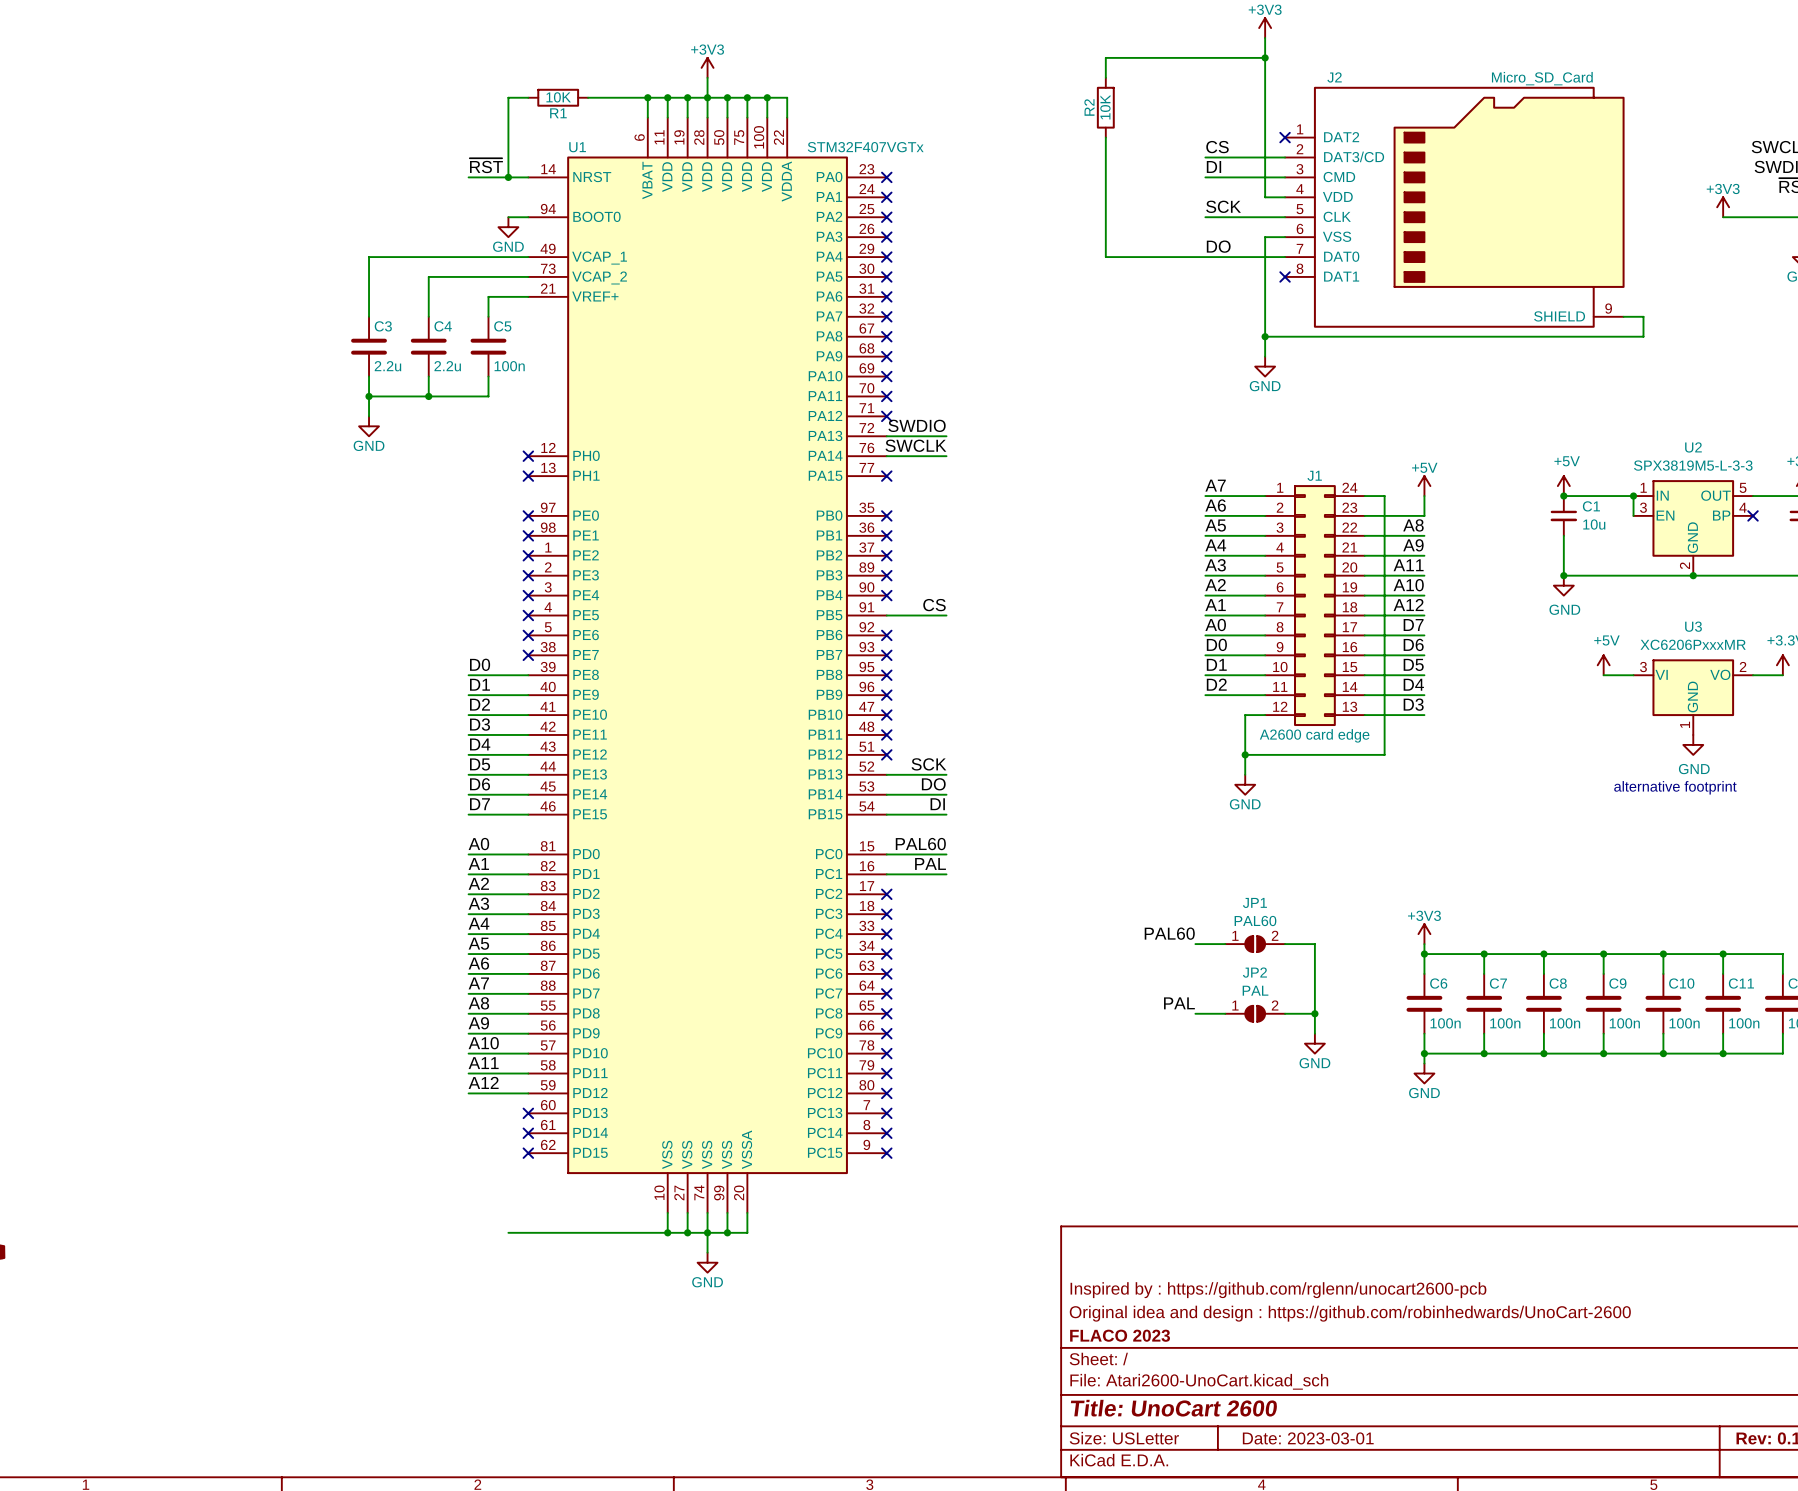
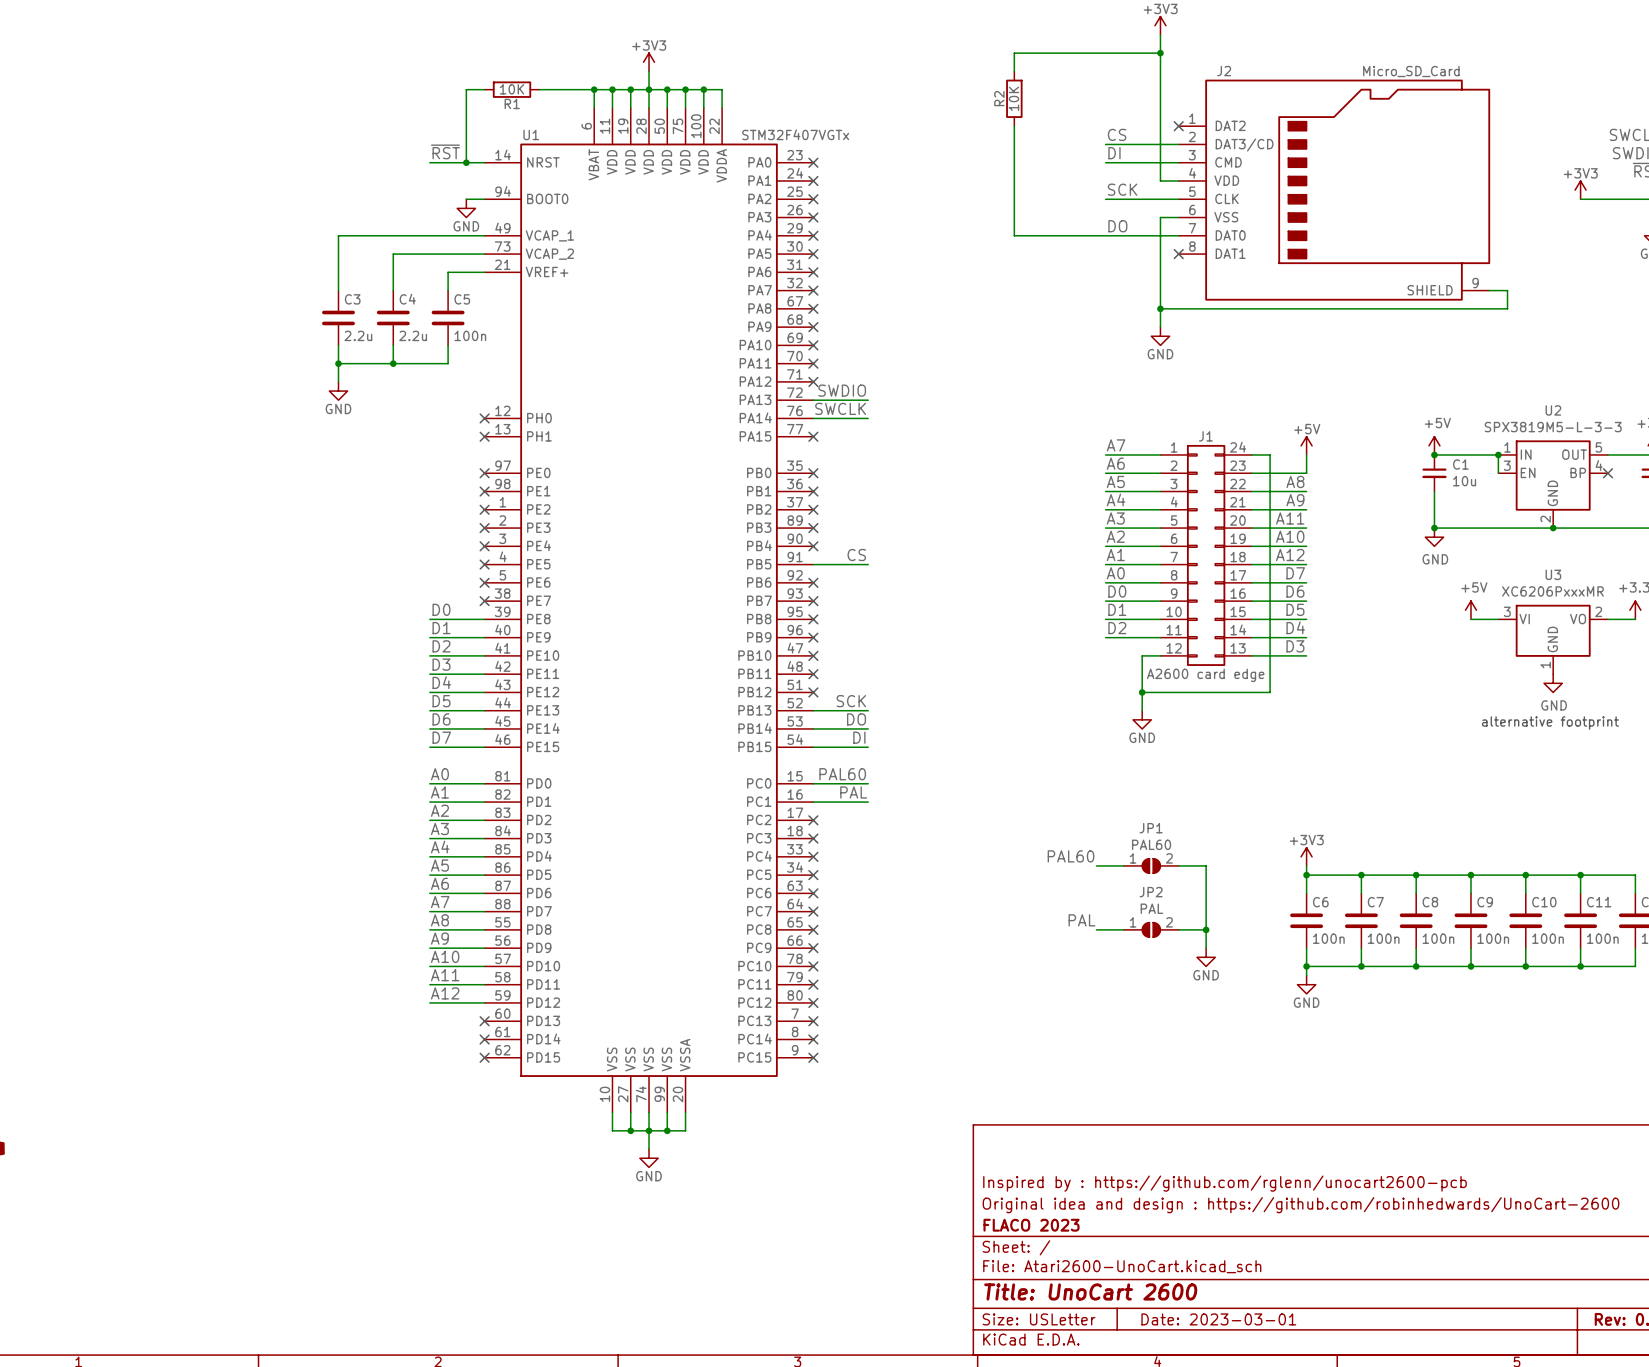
wire: (508, 1232) (667, 1232) -> none
junction: (667, 1232) -> none

